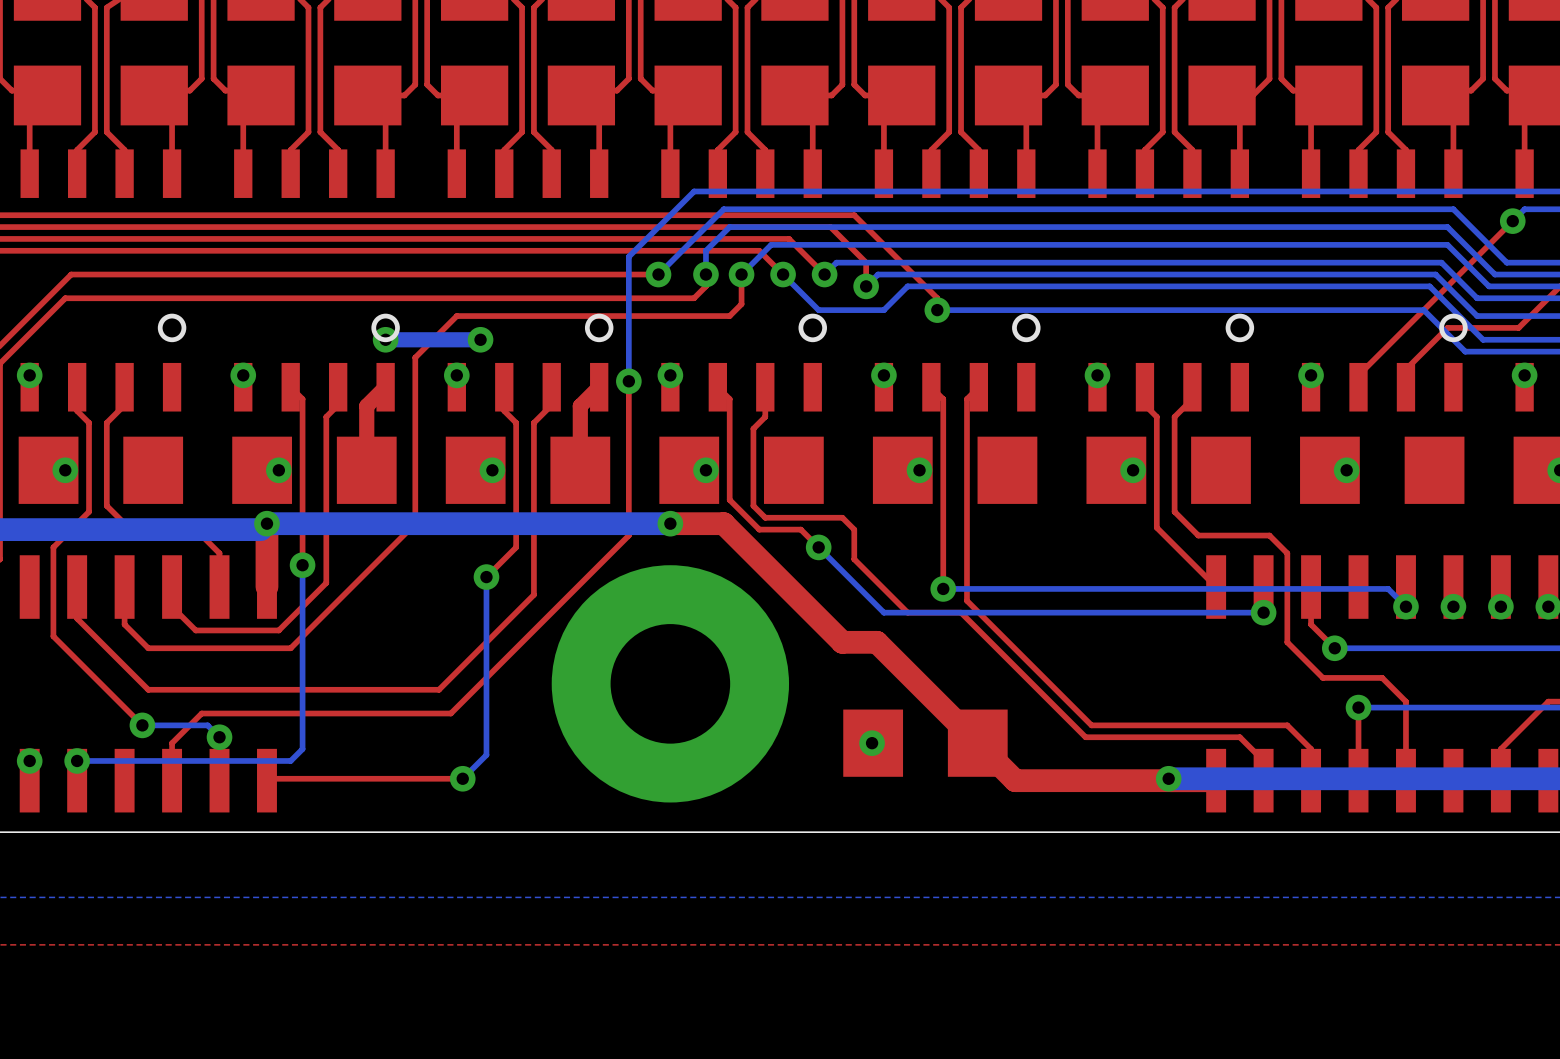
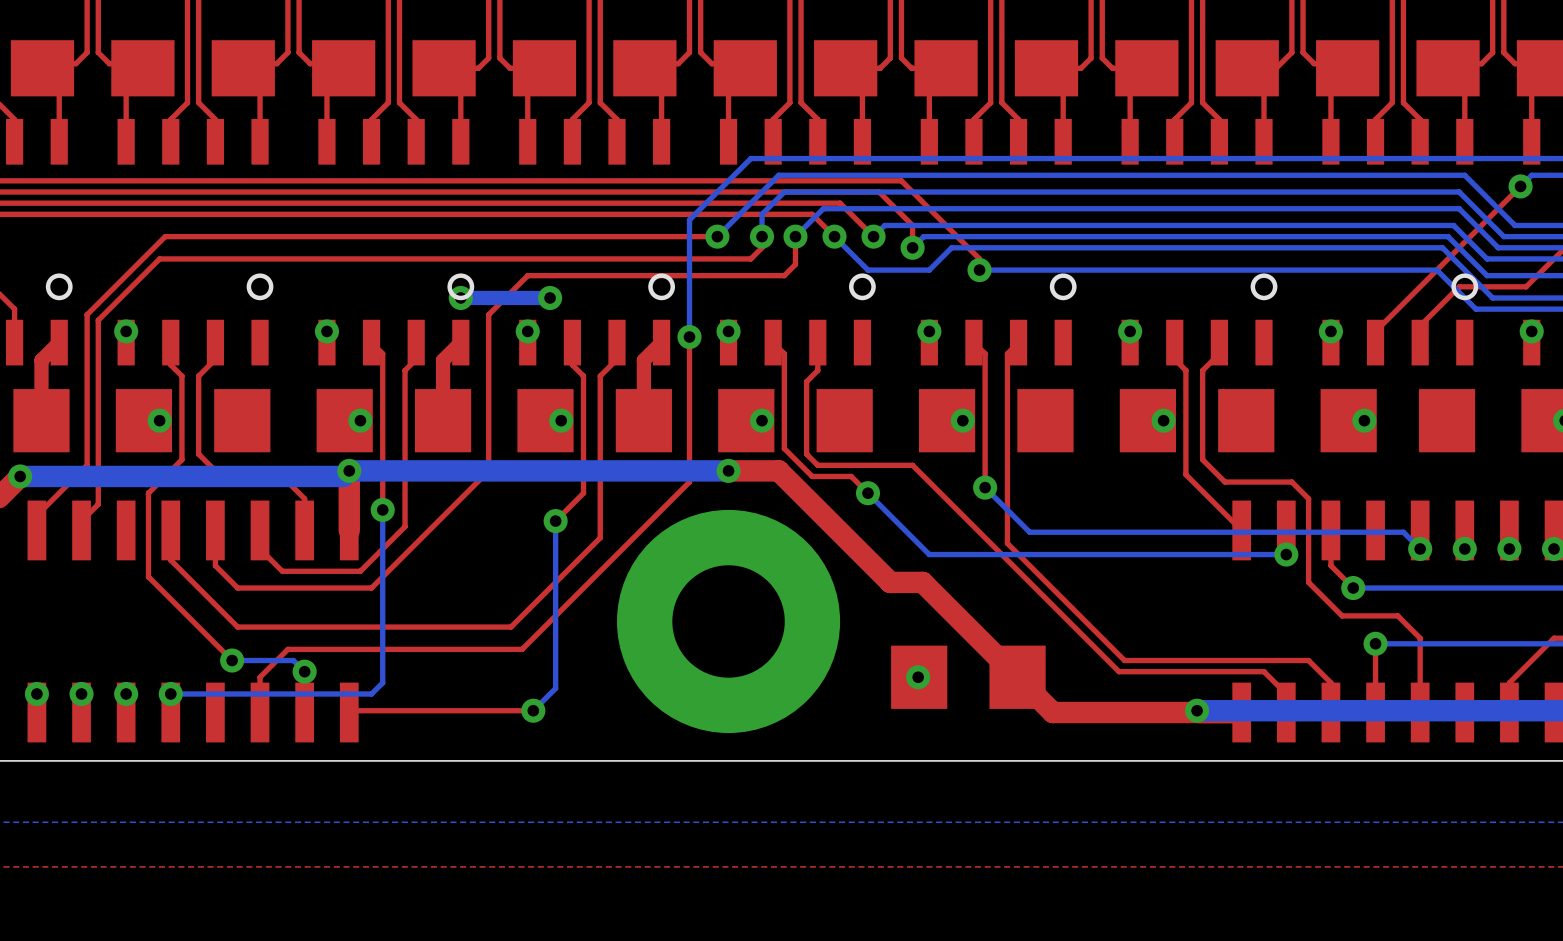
top track: (842, 517) (854, 529) (854, 559) (907, 612) (961, 612) -> (890, 465) (912, 465) (1001, 554)
top track: (943, 541) (943, 588) -> none
via position: (943, 588) -> (985, 487)
bottom track: (990, 588) (943, 588) -> (1029, 532) (985, 487)

